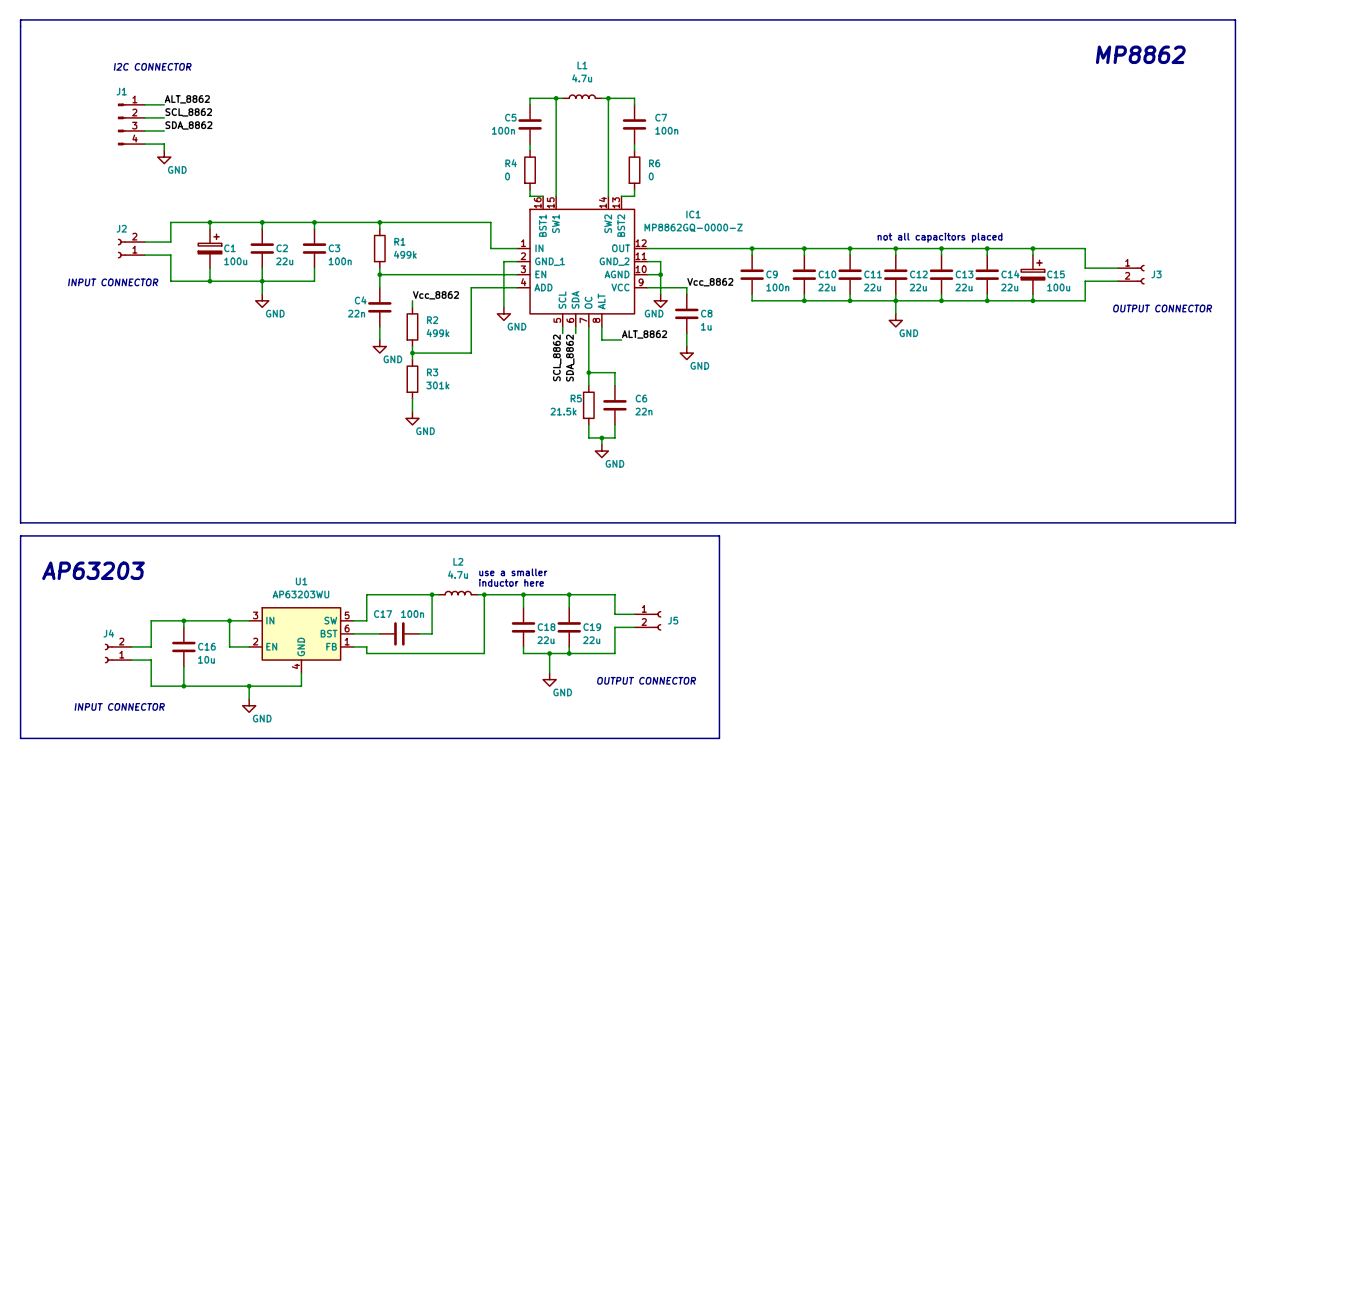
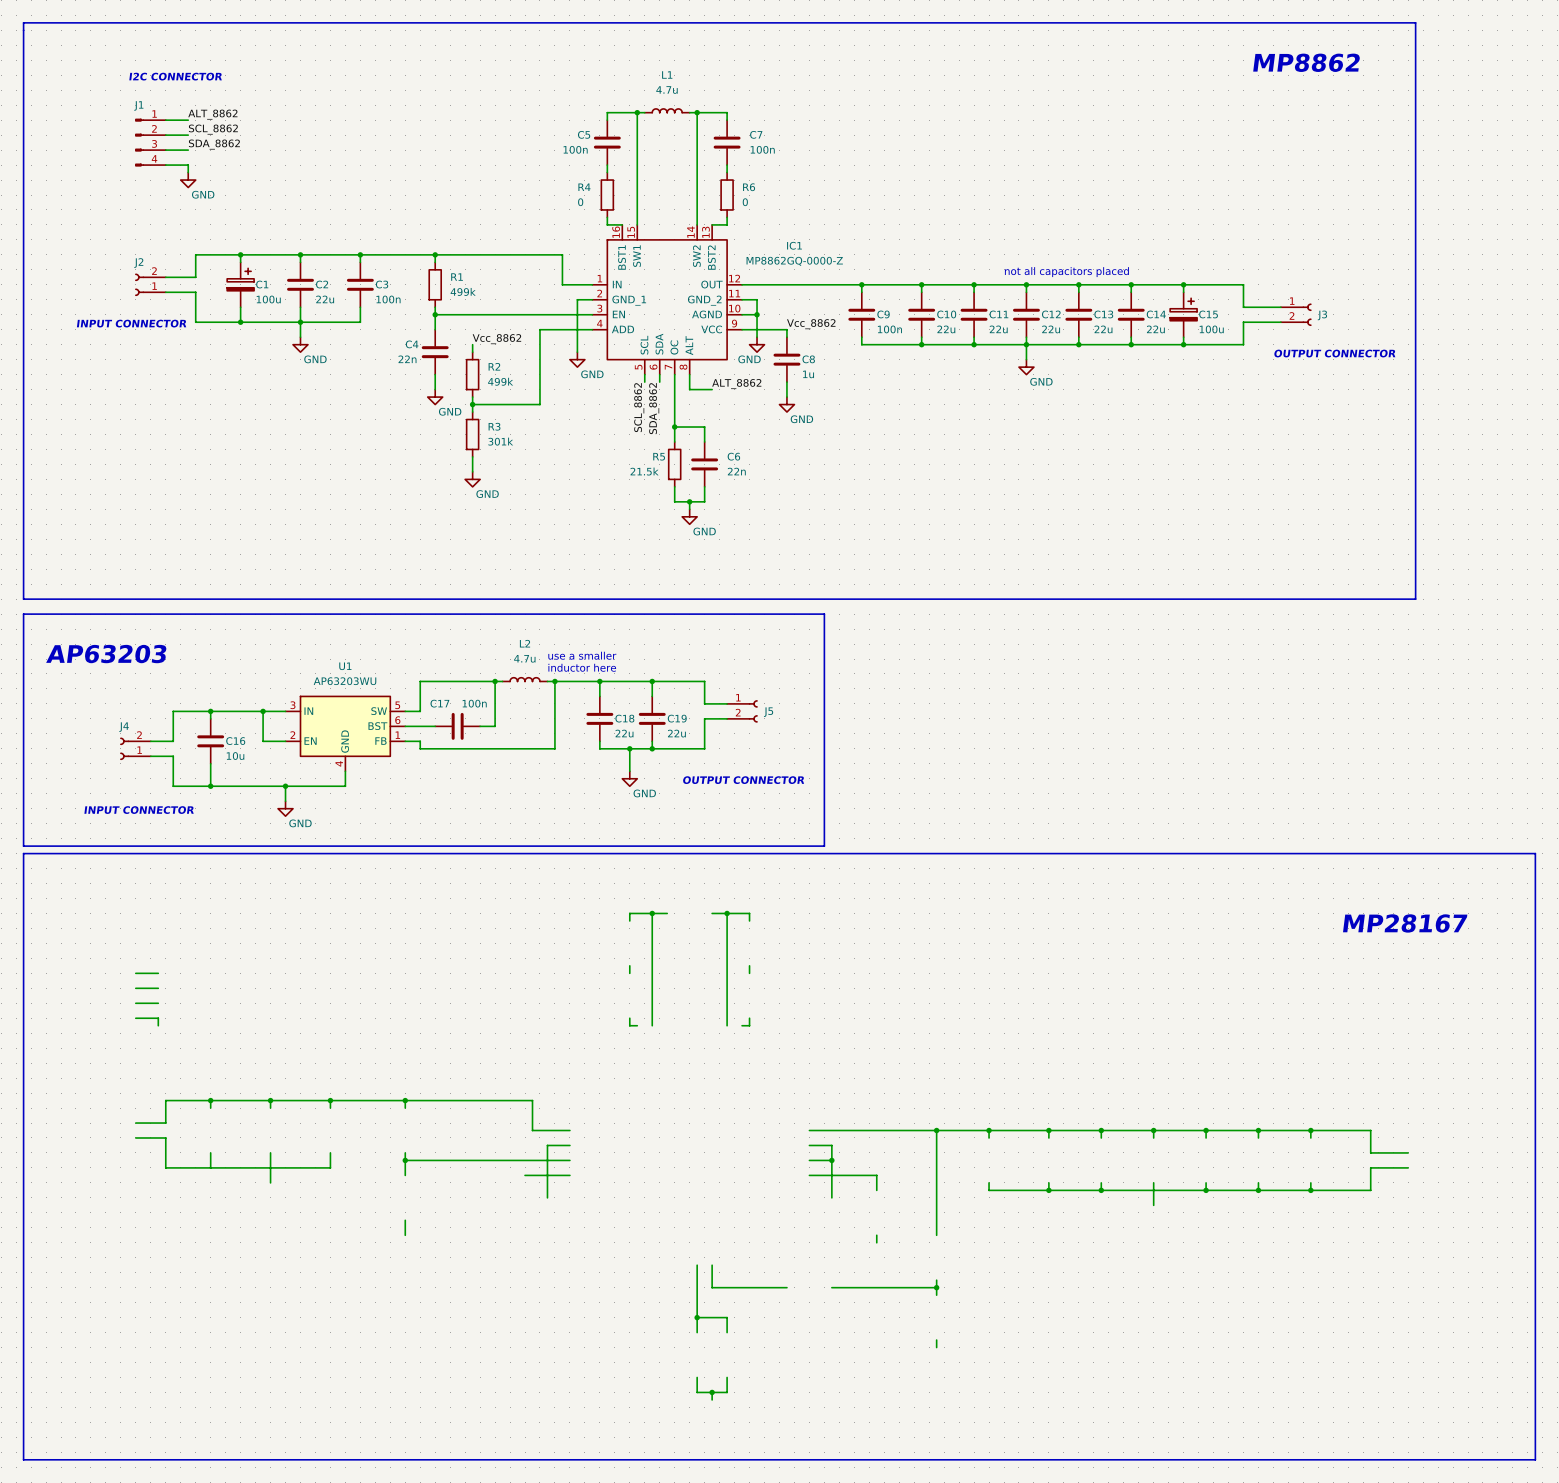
line: none -> (23, 853) (1535, 853) (1535, 1459) (23, 1459) (23, 853)
wire: none -> (652, 913) (652, 1025)
junction: none -> (652, 913)
wire: none -> (667, 913) (629, 913) (629, 920)
wire: none -> (712, 913) (749, 913) (749, 920)
wire: none -> (727, 913) (727, 1025)
junction: none -> (727, 913)
text: none -> MP28167 (1405, 923)
wire: none -> (629, 965) (629, 973)
wire: none -> (749, 965) (749, 973)
wire: none -> (135, 973) (158, 973)
wire: none -> (135, 988) (158, 988)
wire: none -> (135, 1003) (158, 1003)
wire: none -> (135, 1018) (158, 1018) (158, 1025)
wire: none -> (629, 1018) (629, 1025) (637, 1025)
wire: none -> (749, 1018) (749, 1025) (742, 1025)
wire: none -> (210, 1100) (210, 1108)
junction: none -> (210, 1100)
wire: none -> (270, 1100) (270, 1108)
junction: none -> (270, 1100)
wire: none -> (330, 1100) (330, 1108)
junction: none -> (330, 1100)
wire: none -> (405, 1100) (405, 1108)
junction: none -> (405, 1100)
wire: none -> (135, 1123) (165, 1123) (165, 1100) (532, 1100) (532, 1130) (569, 1130)
wire: none -> (809, 1130) (1370, 1130) (1370, 1152) (1408, 1152)
wire: none -> (936, 1130) (936, 1235)
junction: none -> (936, 1130)
wire: none -> (989, 1130) (989, 1137)
junction: none -> (989, 1130)
wire: none -> (1048, 1130) (1048, 1137)
junction: none -> (1048, 1130)
wire: none -> (1101, 1130) (1101, 1137)
junction: none -> (1101, 1130)
wire: none -> (1153, 1130) (1153, 1137)
junction: none -> (1153, 1130)
wire: none -> (1206, 1130) (1206, 1137)
junction: none -> (1206, 1130)
wire: none -> (1258, 1130) (1258, 1137)
junction: none -> (1258, 1130)
wire: none -> (1310, 1130) (1310, 1137)
junction: none -> (1310, 1130)
wire: none -> (135, 1137) (165, 1137) (165, 1167) (330, 1167) (330, 1152)
wire: none -> (569, 1145) (547, 1145) (547, 1197)
wire: none -> (809, 1145) (831, 1145) (831, 1197)
wire: none -> (210, 1152) (210, 1167)
wire: none -> (270, 1152) (270, 1182)
wire: none -> (405, 1152) (405, 1175)
wire: none -> (405, 1160) (569, 1160)
junction: none -> (405, 1160)
wire: none -> (809, 1160) (831, 1160)
junction: none -> (831, 1160)
wire: none -> (1408, 1167) (1370, 1167) (1370, 1190) (989, 1190) (989, 1182)
wire: none -> (525, 1175) (569, 1175)
wire: none -> (809, 1175) (876, 1175) (876, 1190)
wire: none -> (1048, 1182) (1048, 1190)
wire: none -> (1101, 1182) (1101, 1190)
wire: none -> (1153, 1182) (1153, 1205)
wire: none -> (1206, 1182) (1206, 1190)
wire: none -> (1258, 1182) (1258, 1190)
wire: none -> (1310, 1182) (1310, 1190)
junction: none -> (1048, 1190)
junction: none -> (1101, 1190)
junction: none -> (1206, 1190)
junction: none -> (1258, 1190)
junction: none -> (1310, 1190)
wire: none -> (405, 1220) (405, 1235)
wire: none -> (876, 1235) (876, 1242)
wire: none -> (697, 1265) (697, 1332)
wire: none -> (712, 1265) (712, 1287) (786, 1287)
wire: none -> (936, 1280) (936, 1295)
wire: none -> (831, 1287) (936, 1287)
junction: none -> (936, 1287)
wire: none -> (697, 1317) (727, 1317) (727, 1332)
junction: none -> (697, 1317)
wire: none -> (936, 1340) (936, 1347)
wire: none -> (697, 1377) (697, 1392) (727, 1392) (727, 1377)
wire: none -> (712, 1392) (712, 1399)
junction: none -> (712, 1392)

